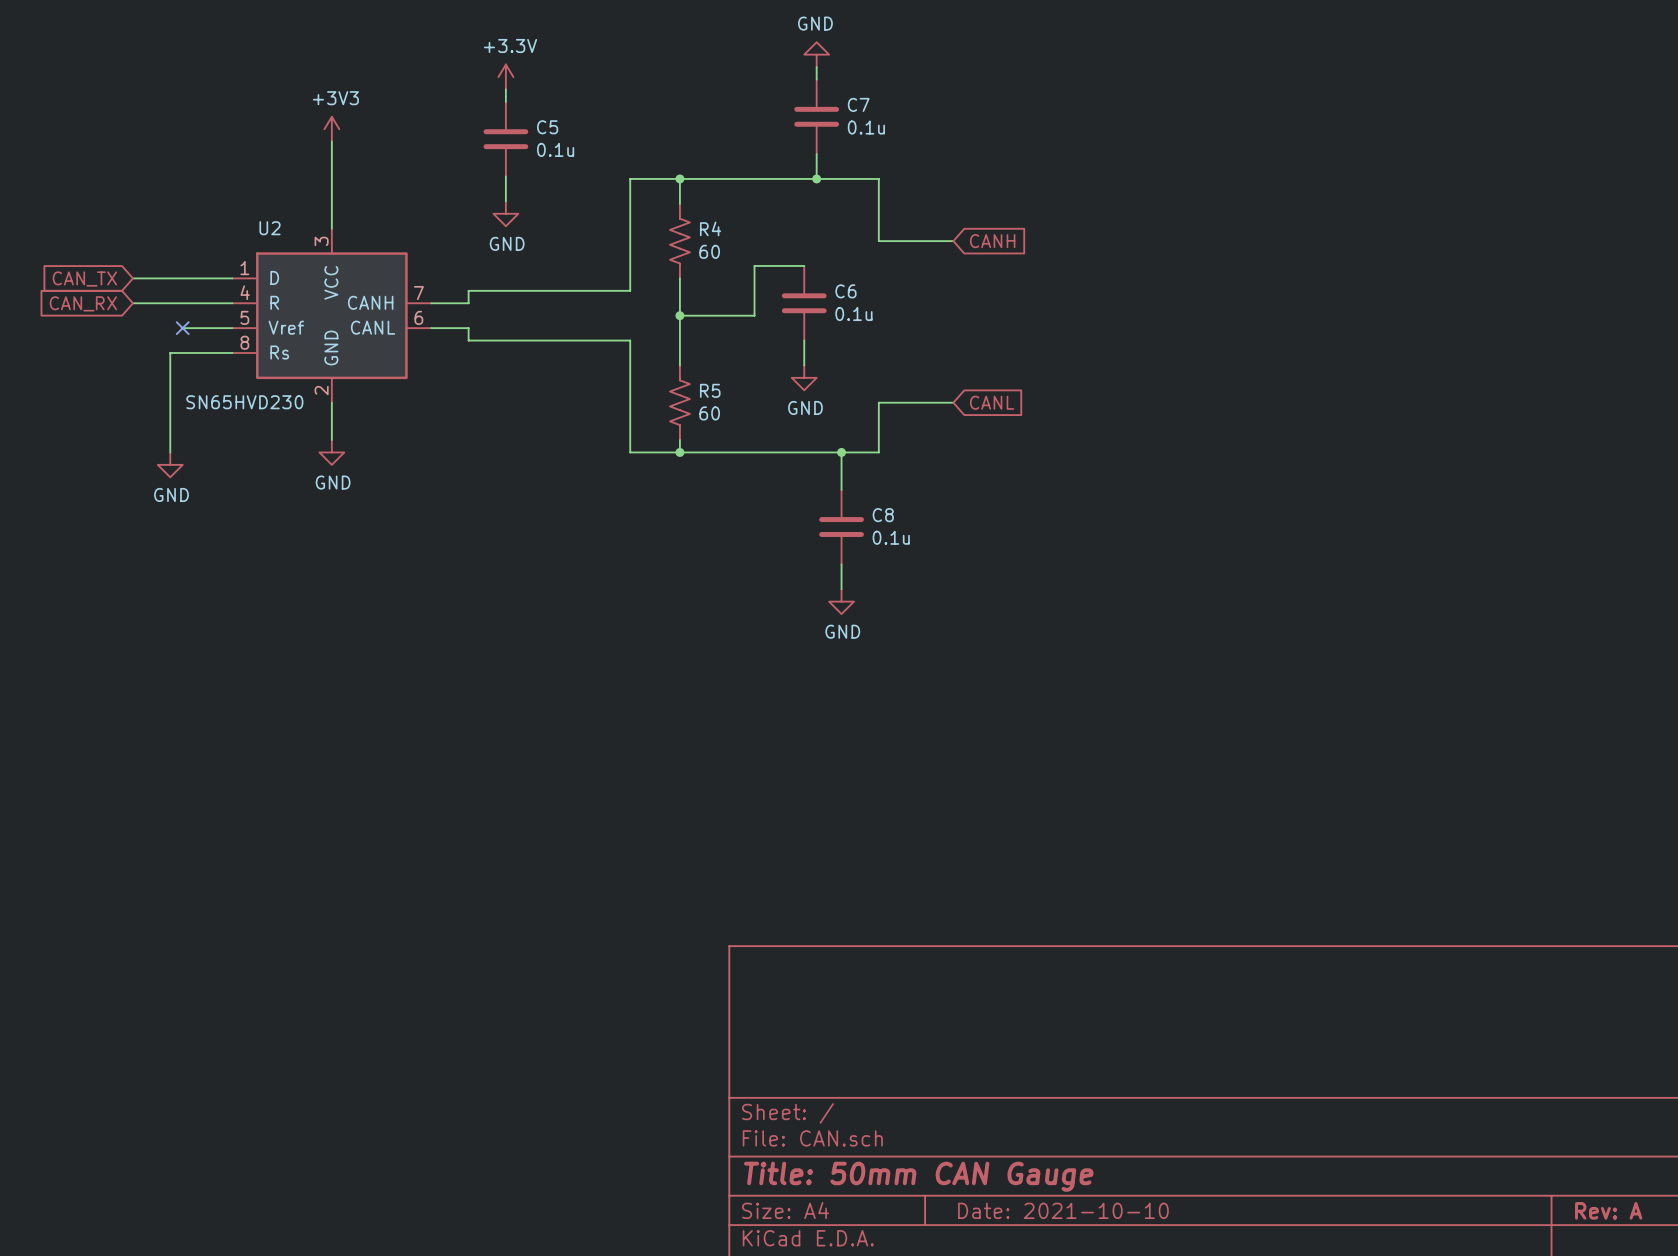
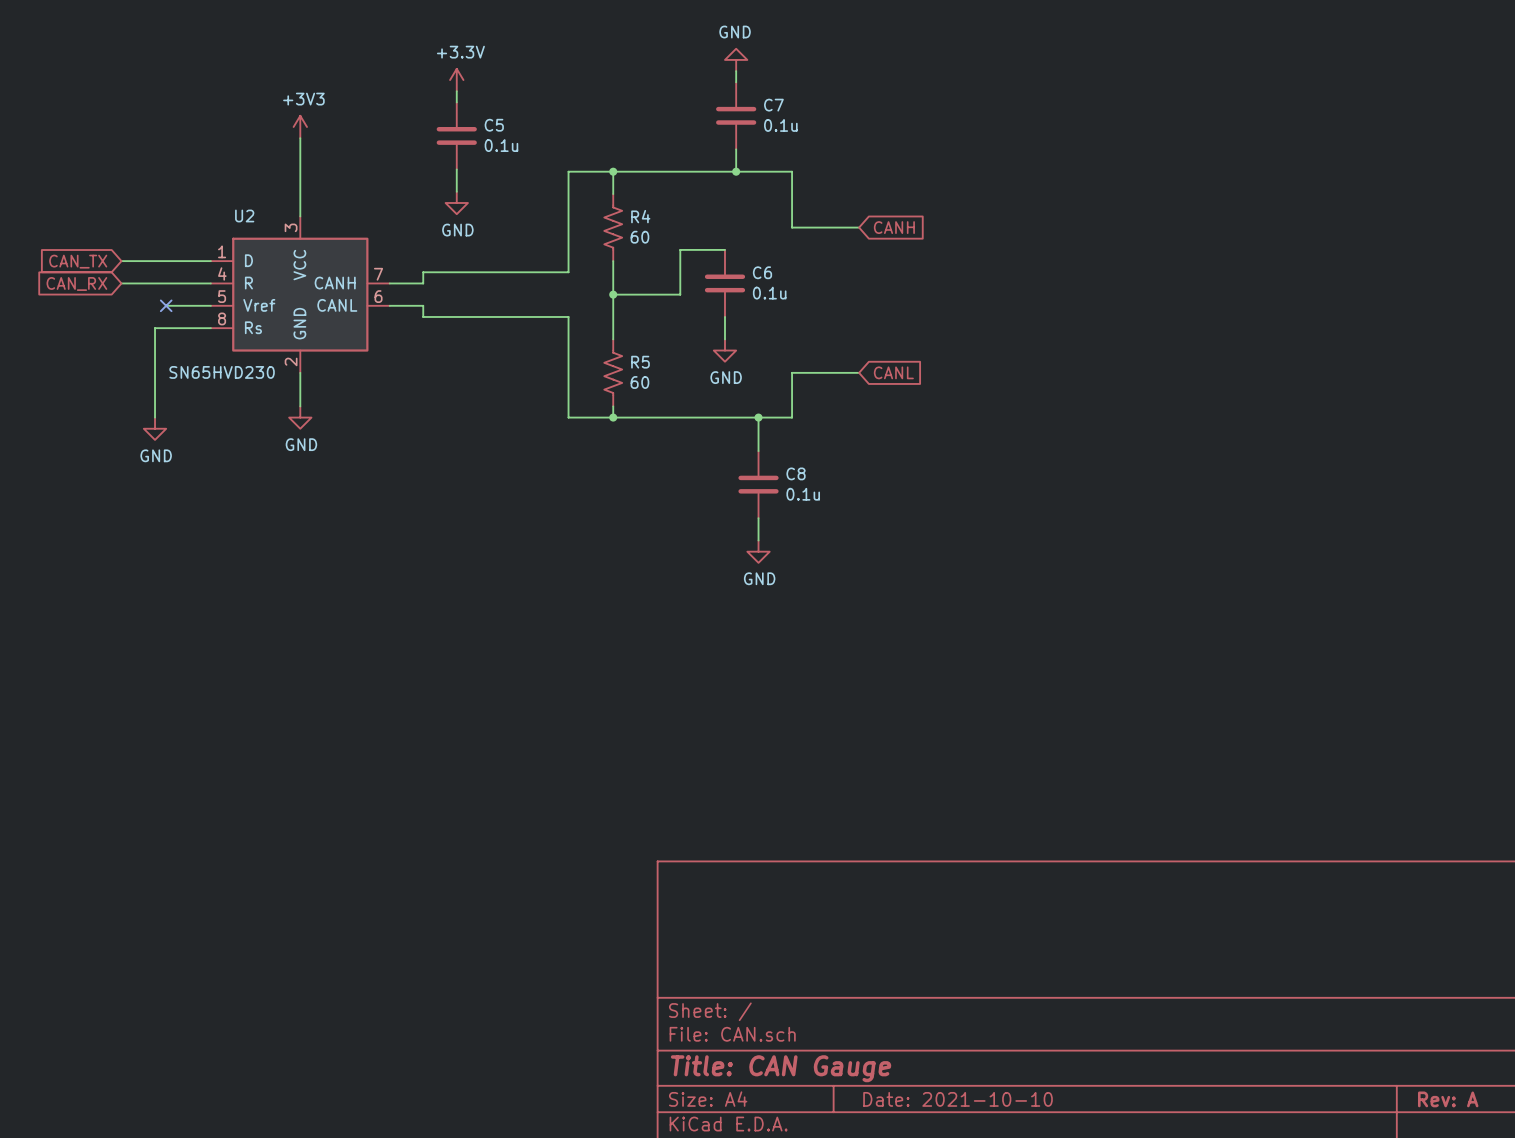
title block: Title: 50mm CAN Gauge (918, 1176) -> Title: CAN Gauge (781, 1068)

